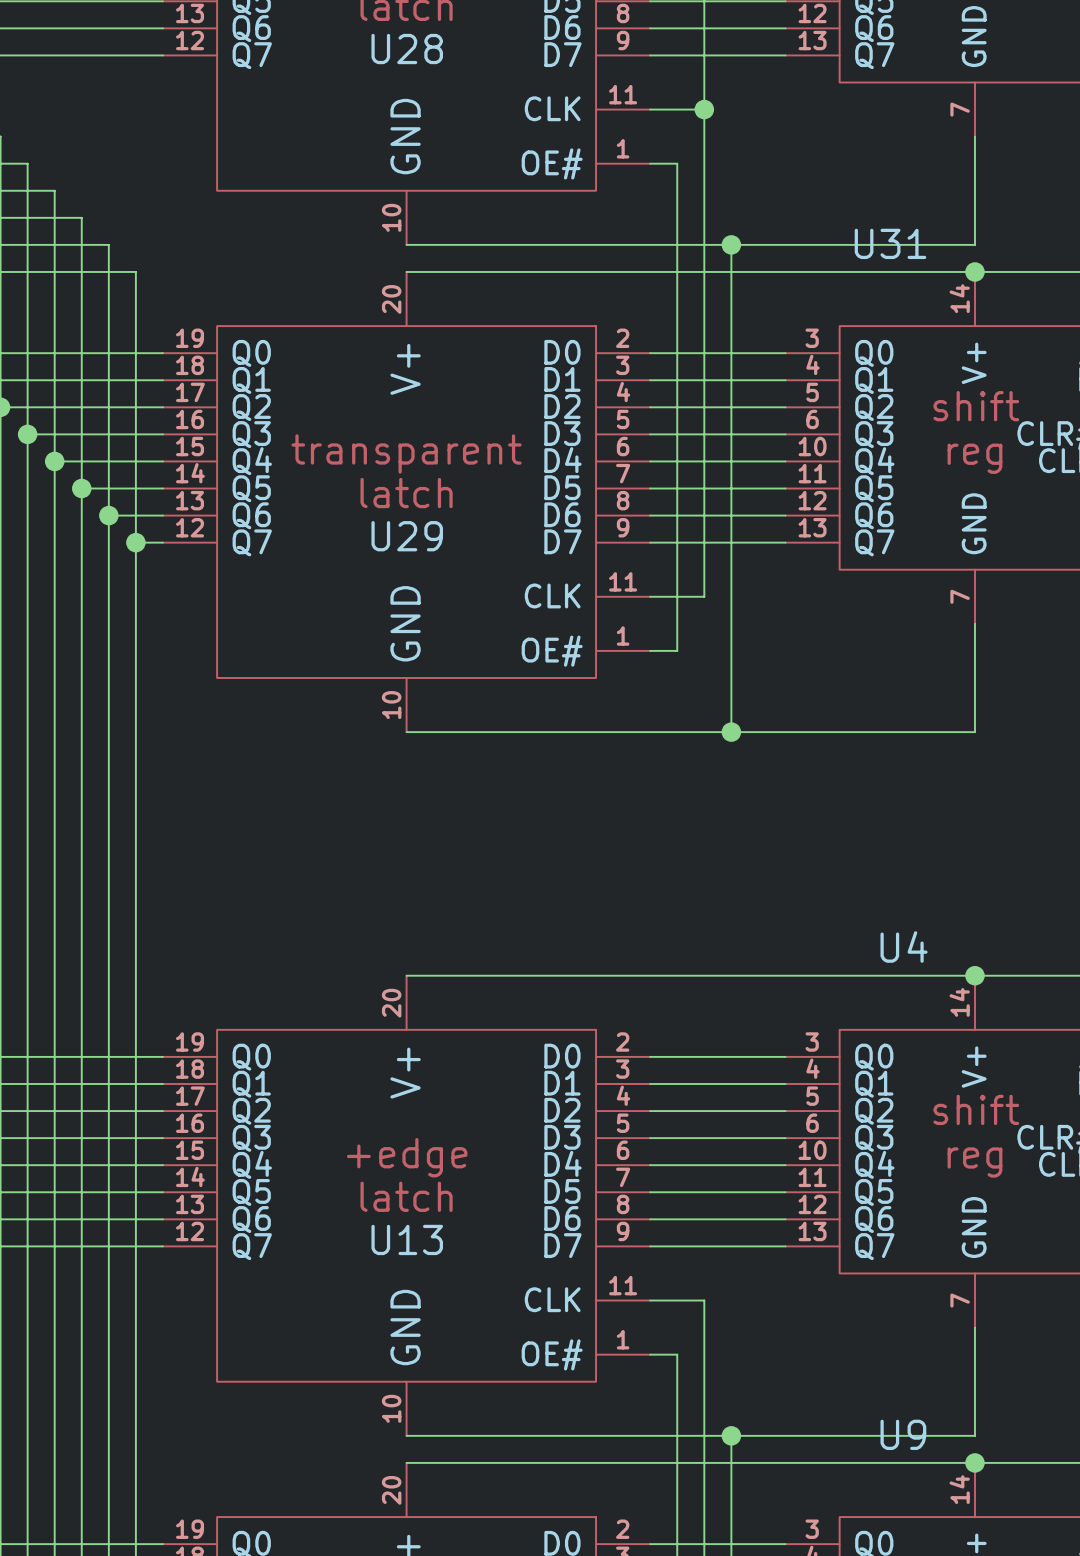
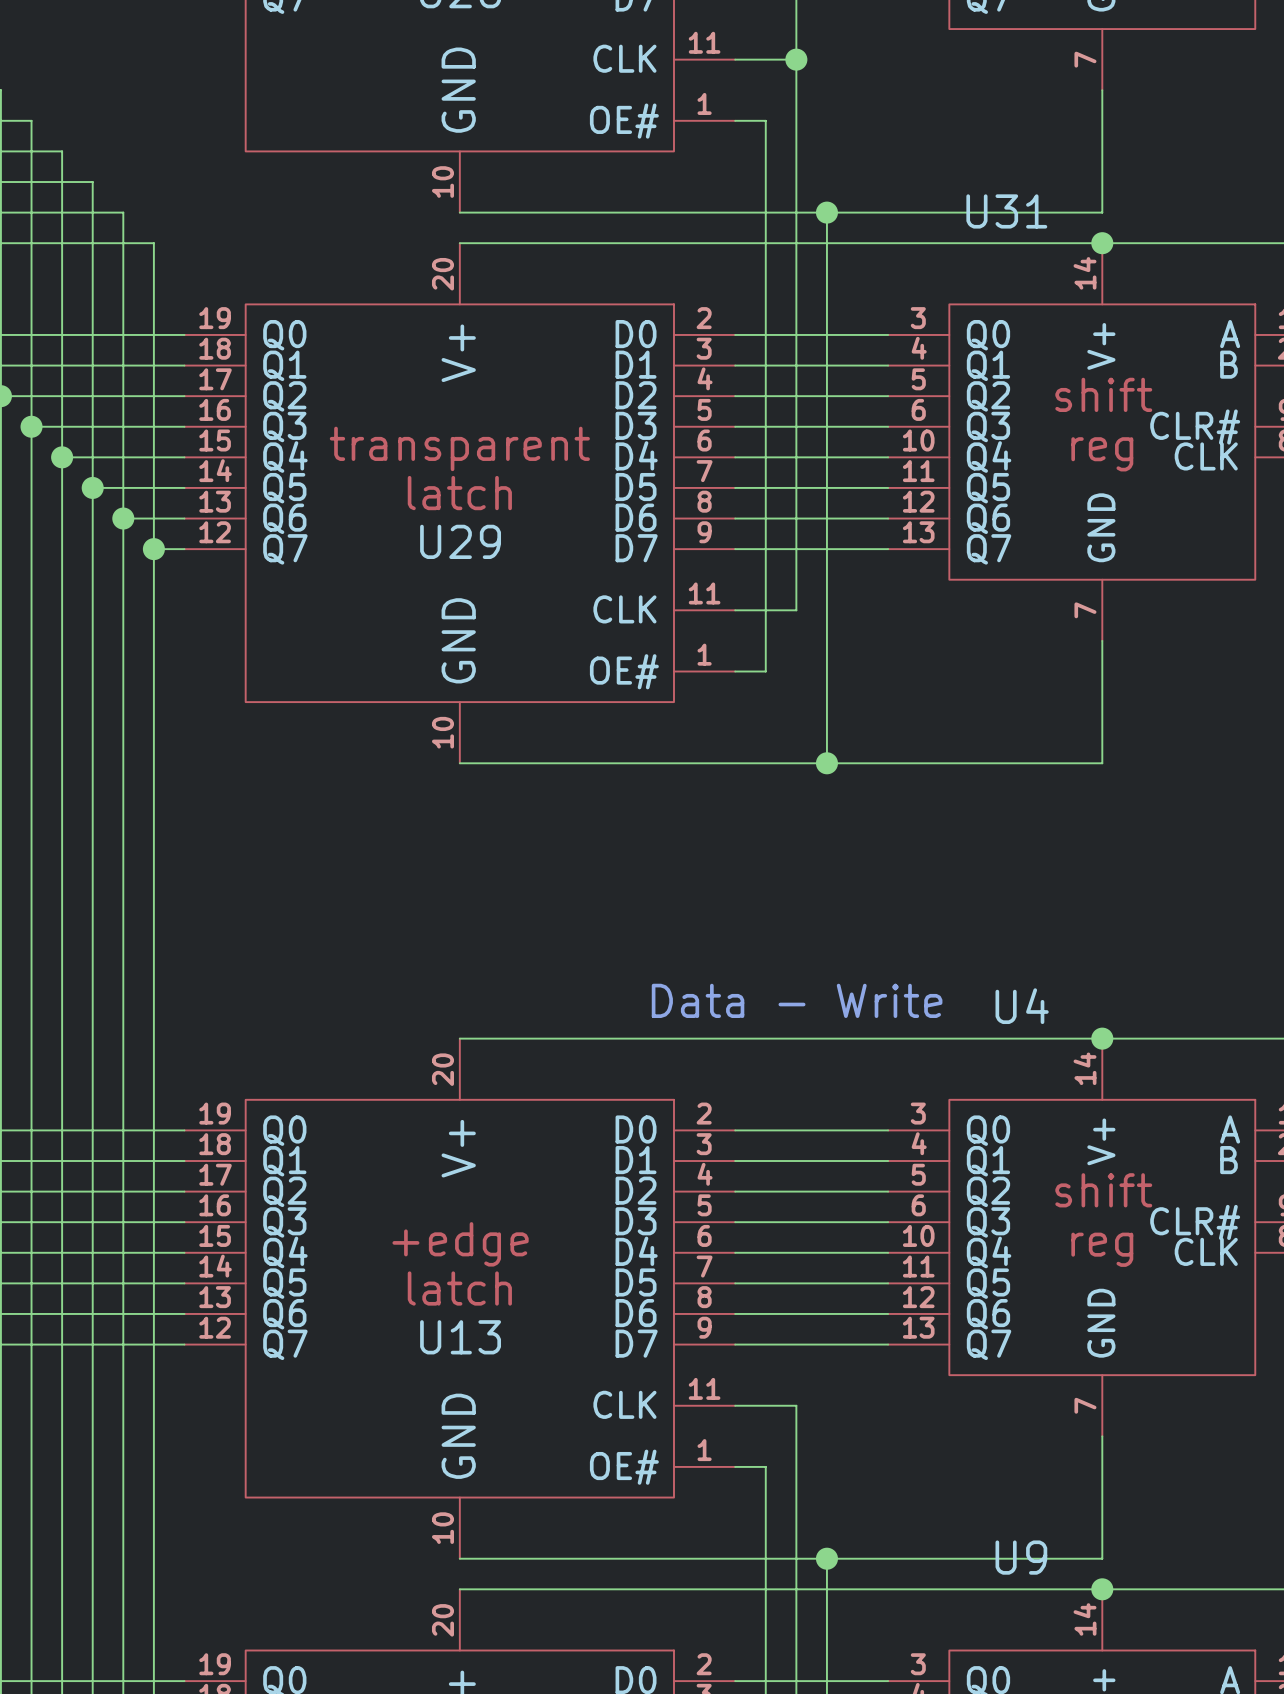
text: none -> Data - Write (797, 1000)

